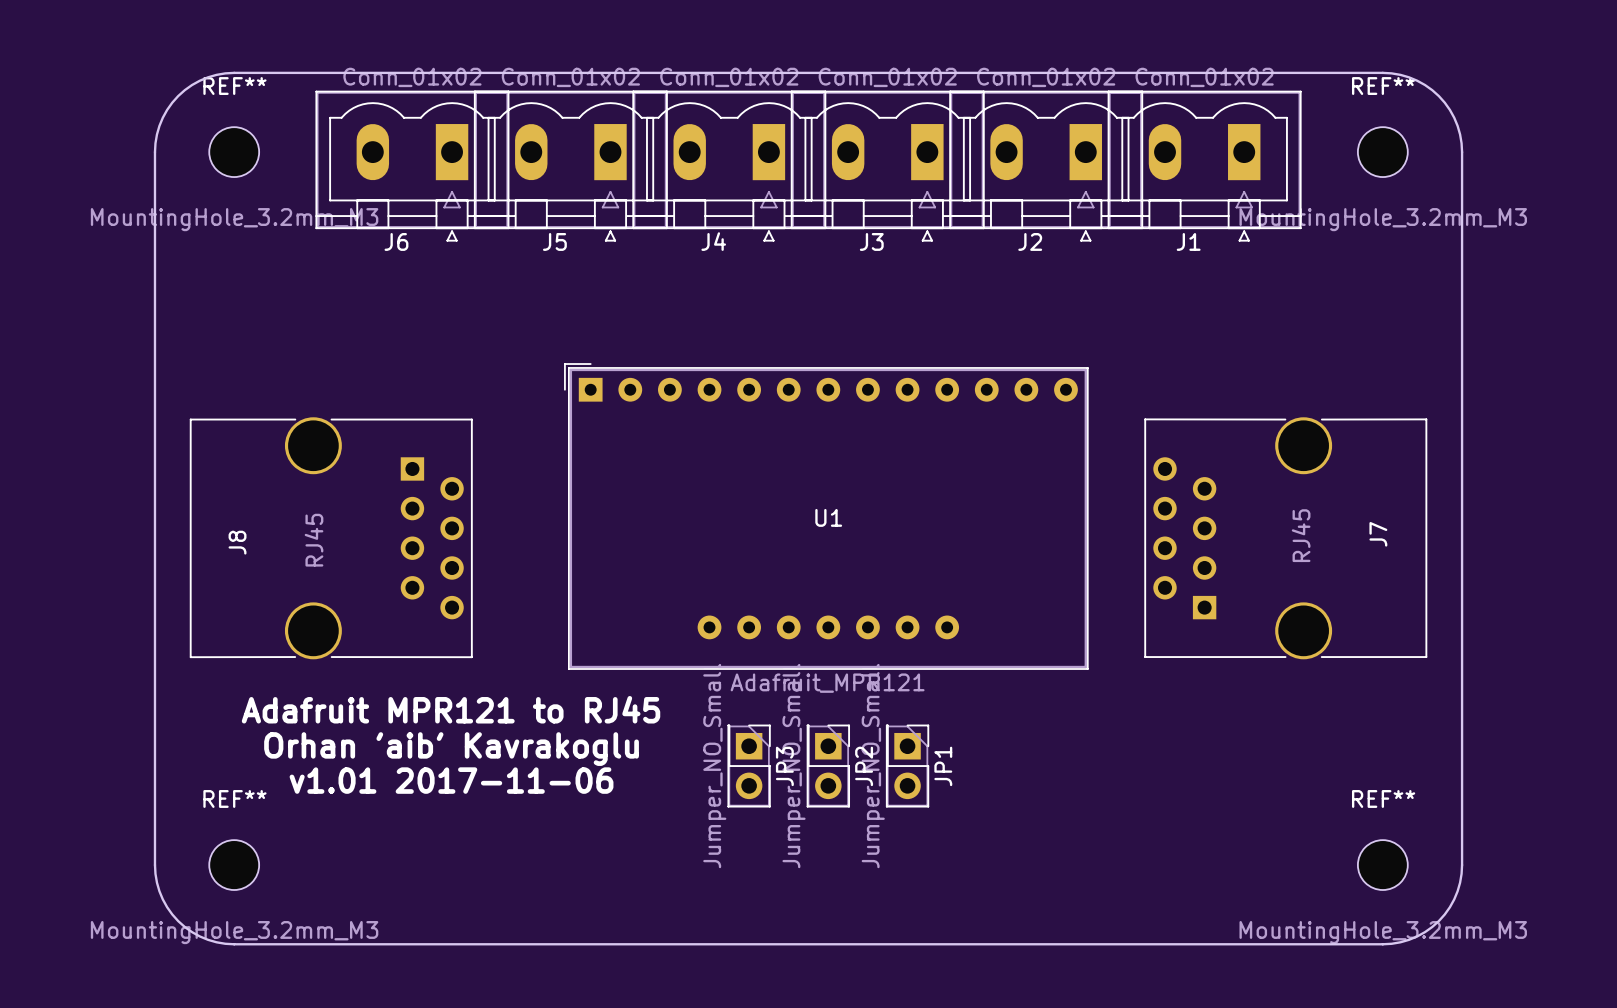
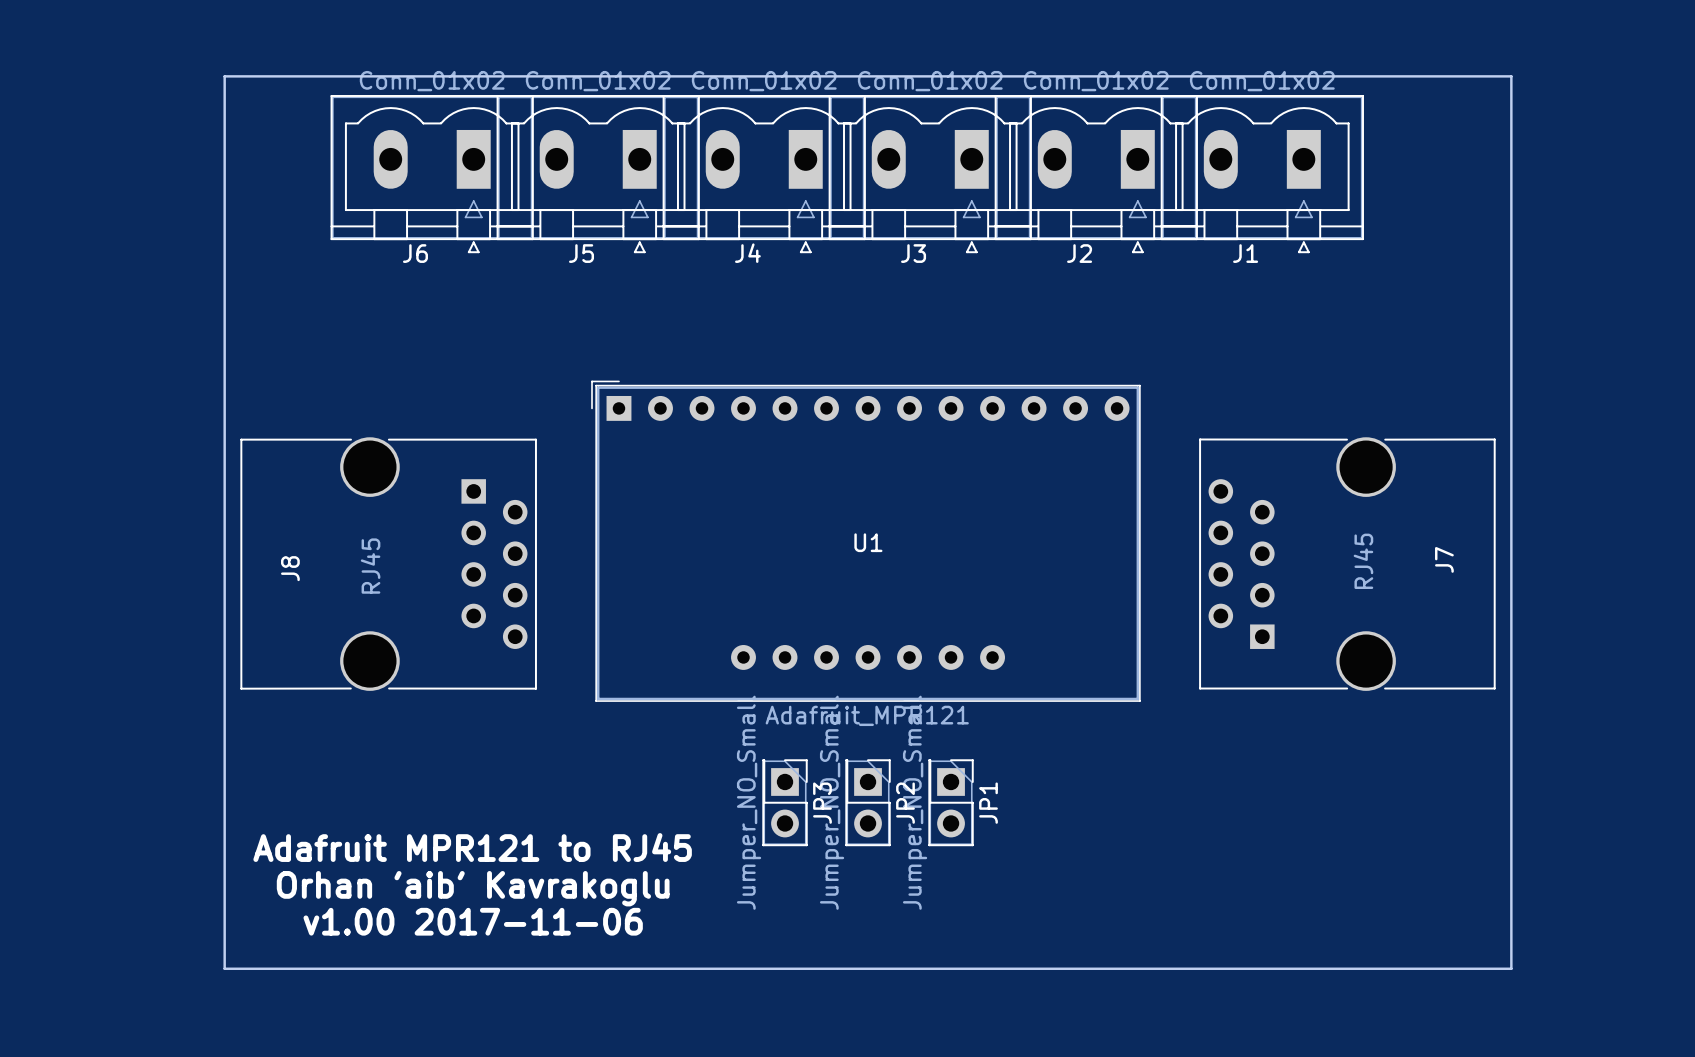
board edge: (234, 72) (216, 74) (199, 80) (178, 96) (162, 117) (156, 134) (154, 152) (155, 873) (162, 899) (178, 921) (199, 936) (216, 942) (234, 944) (1382, 944) (1409, 939) (1432, 926) (1444, 914) (1454, 899) (1460, 882) (1462, 865) (1461, 143) (1454, 117) (1438, 96) (1417, 80) (1400, 74) (1382, 72) -> (245, 76) (224, 76) (224, 968) (1511, 968) (1511, 76) (1449, 76)
REF**: MountingHole_3.2mm_M3 (234, 152) -> none
REF**: MountingHole_3.2mm_M3 (1382, 152) -> none
J8 position: (331, 538) -> (388, 564)
text position: Adafruit MPR121 to RJ45 (451, 709) -> Adafruit MPR121 to RJ45 (472, 847)
text position: Orhan 'aib' Kavrakoglu (451, 749) -> Orhan 'aib' Kavrakoglu (473, 888)
text: v1.01 2017-11-06 (451, 780) -> none
REF**: MountingHole_3.2mm_M3 (234, 865) -> none
REF**: MountingHole_3.2mm_M3 (1382, 865) -> none
text: none -> v1.00 2017-11-06 (473, 921)

